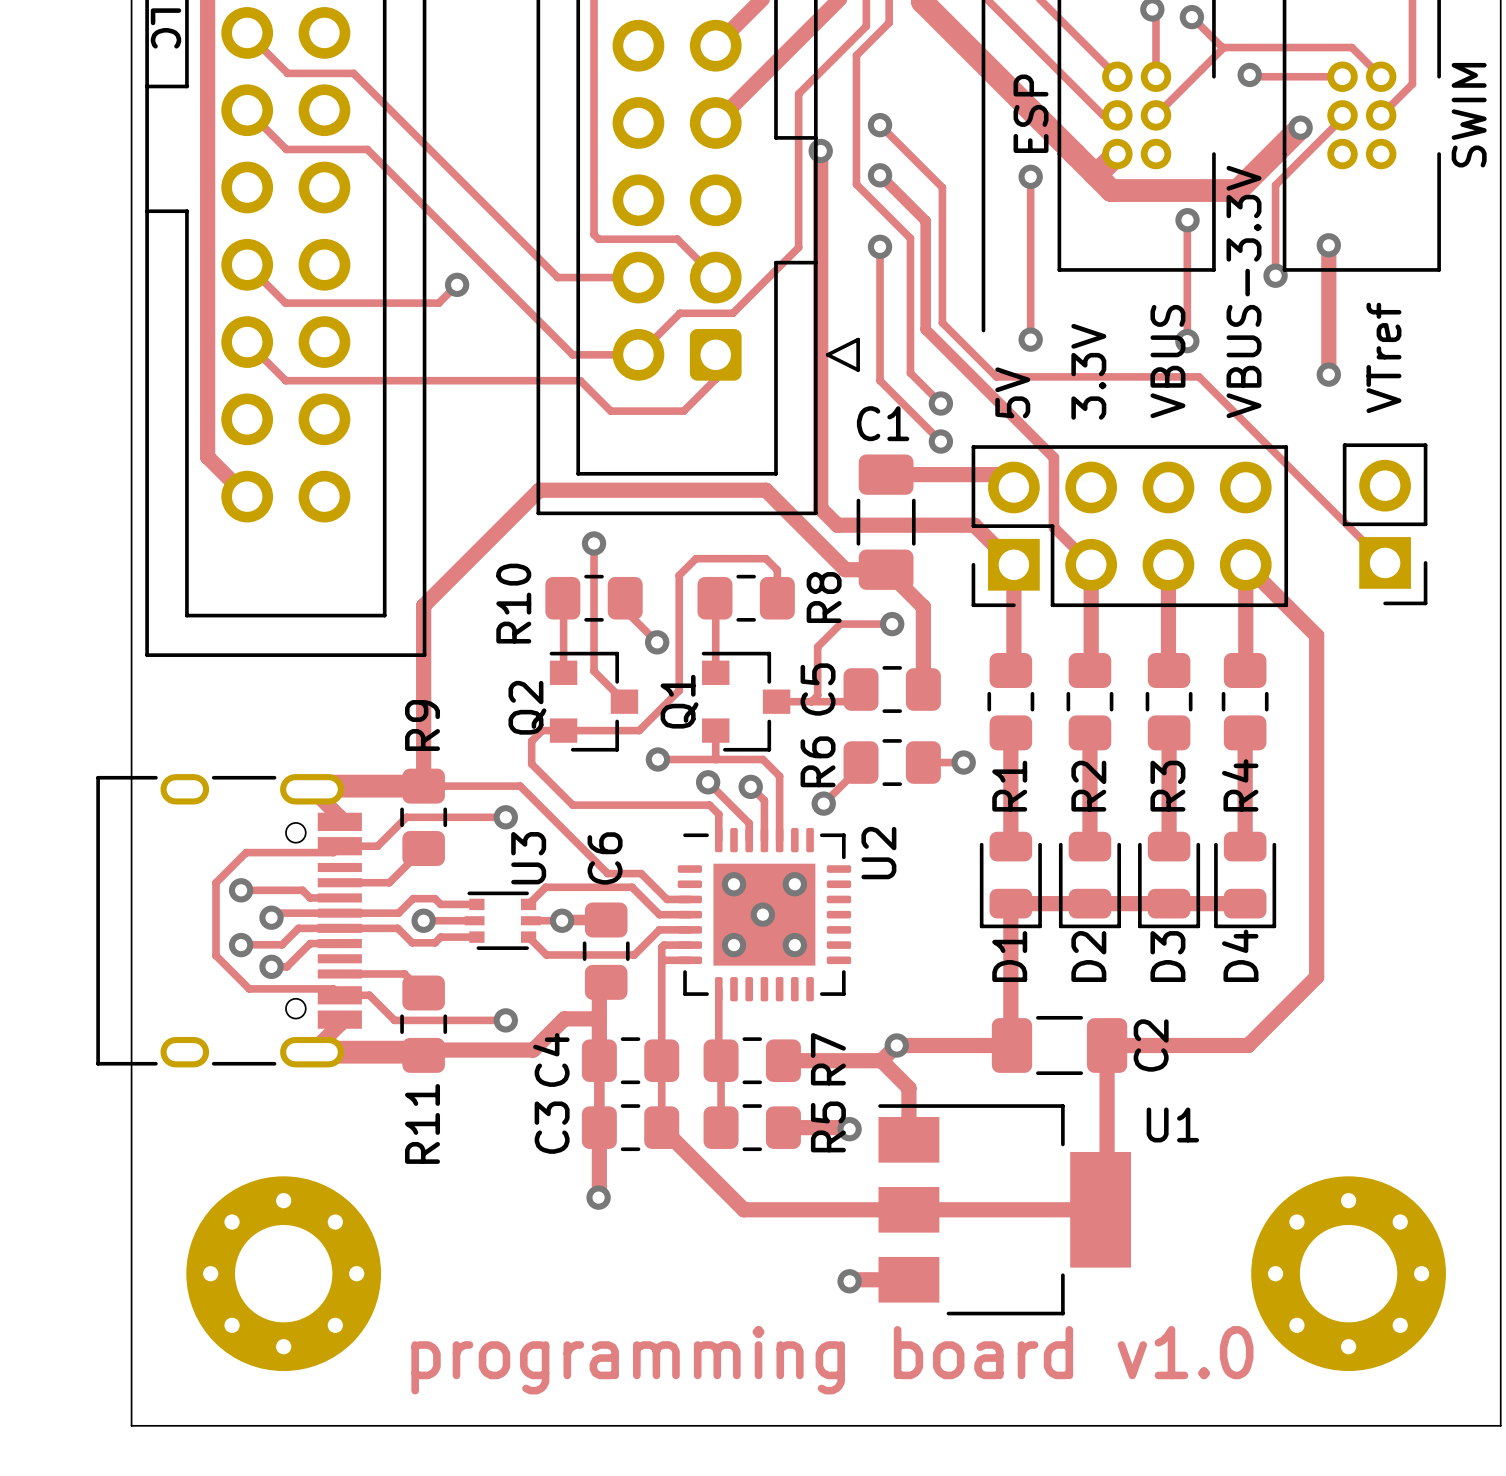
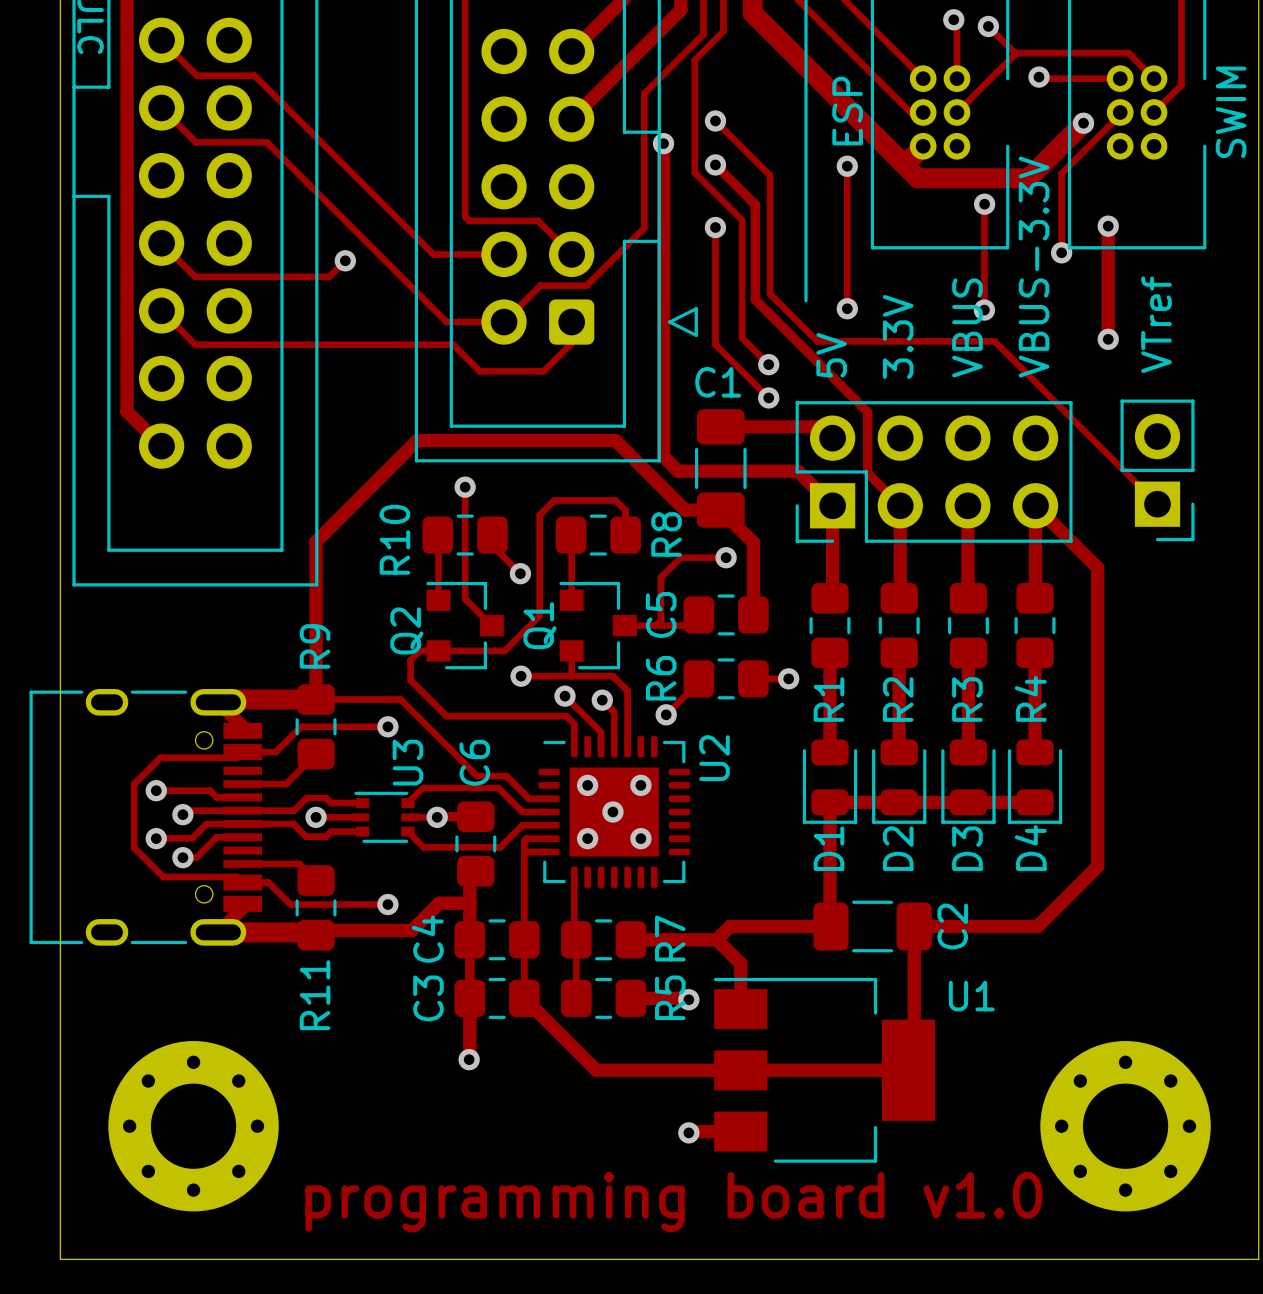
via: (896, 1045) -> none

